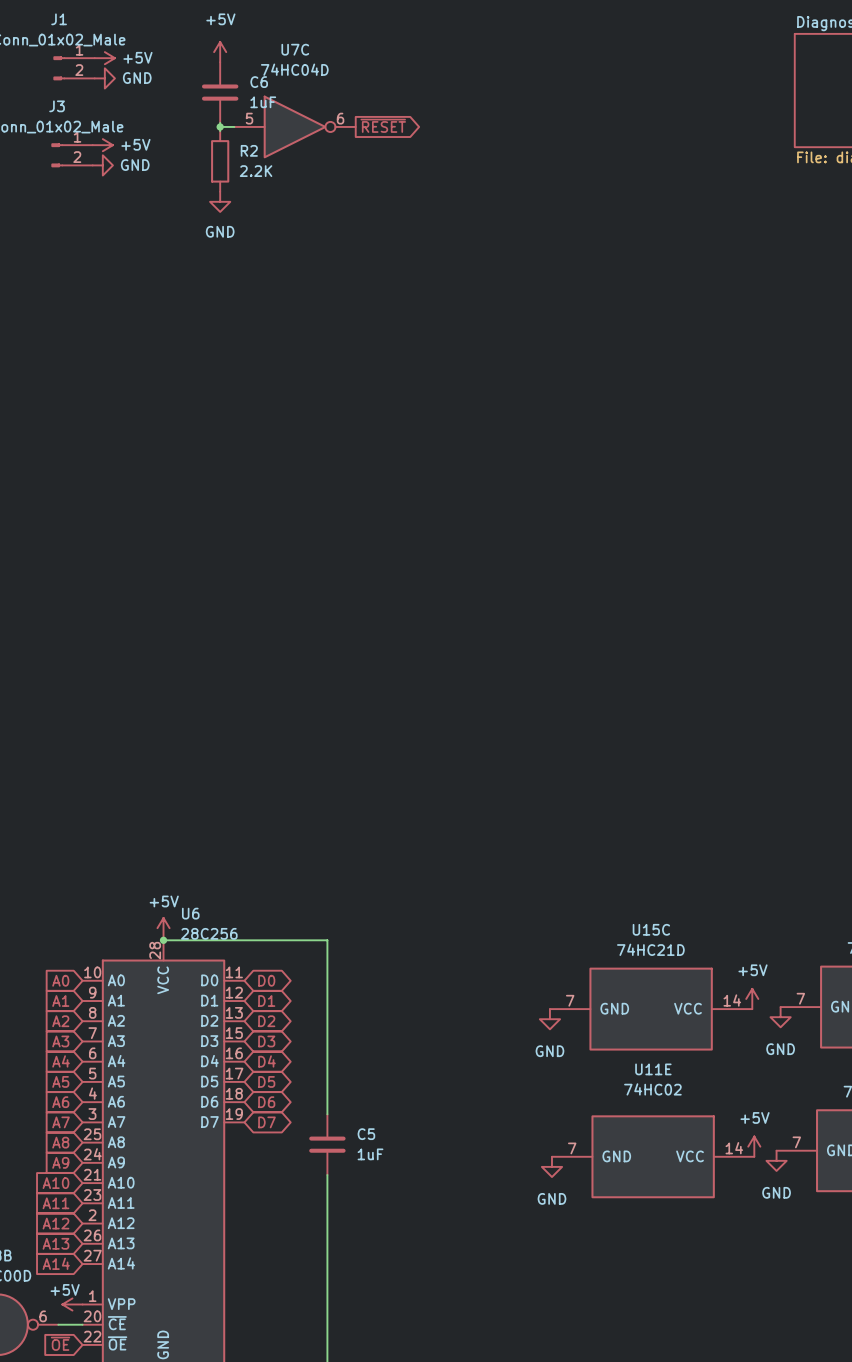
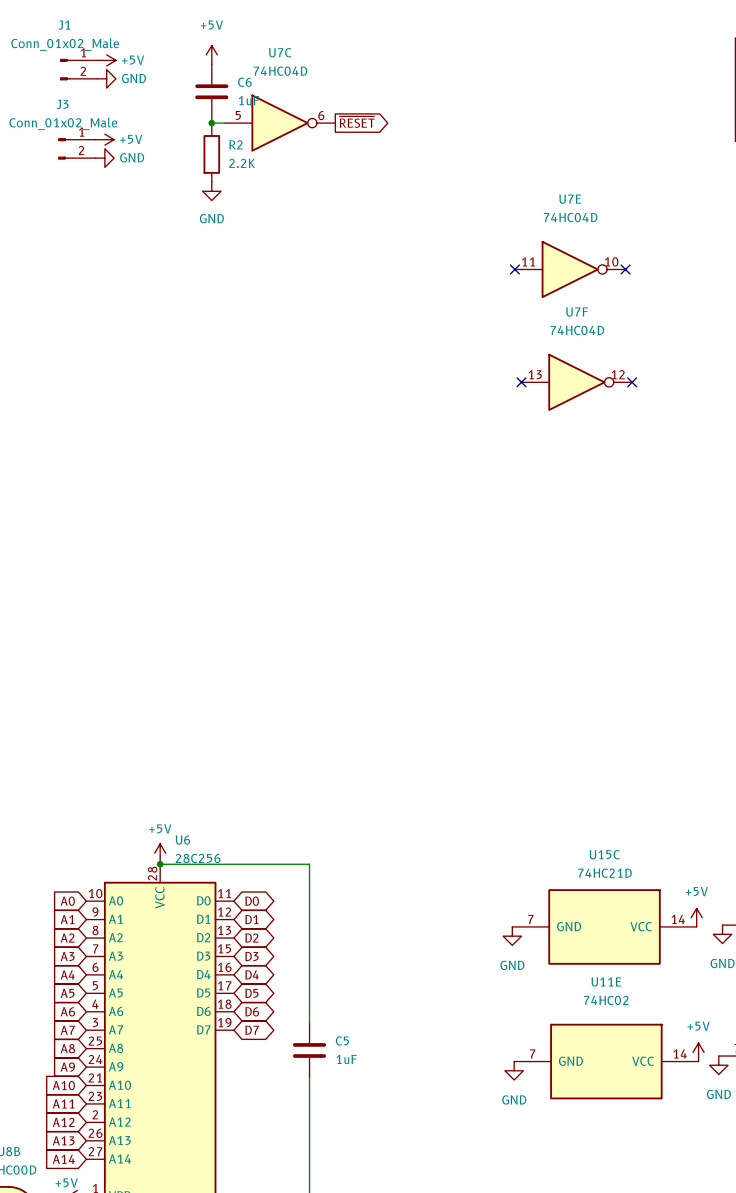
no-connect mark: none -> (514, 269)
U7E: none -> 74HC04D (570, 269)
no-connect mark: none -> (625, 269)
no-connect mark: none -> (521, 382)
U7F: none -> 74HC04D (576, 382)
no-connect mark: none -> (632, 382)

